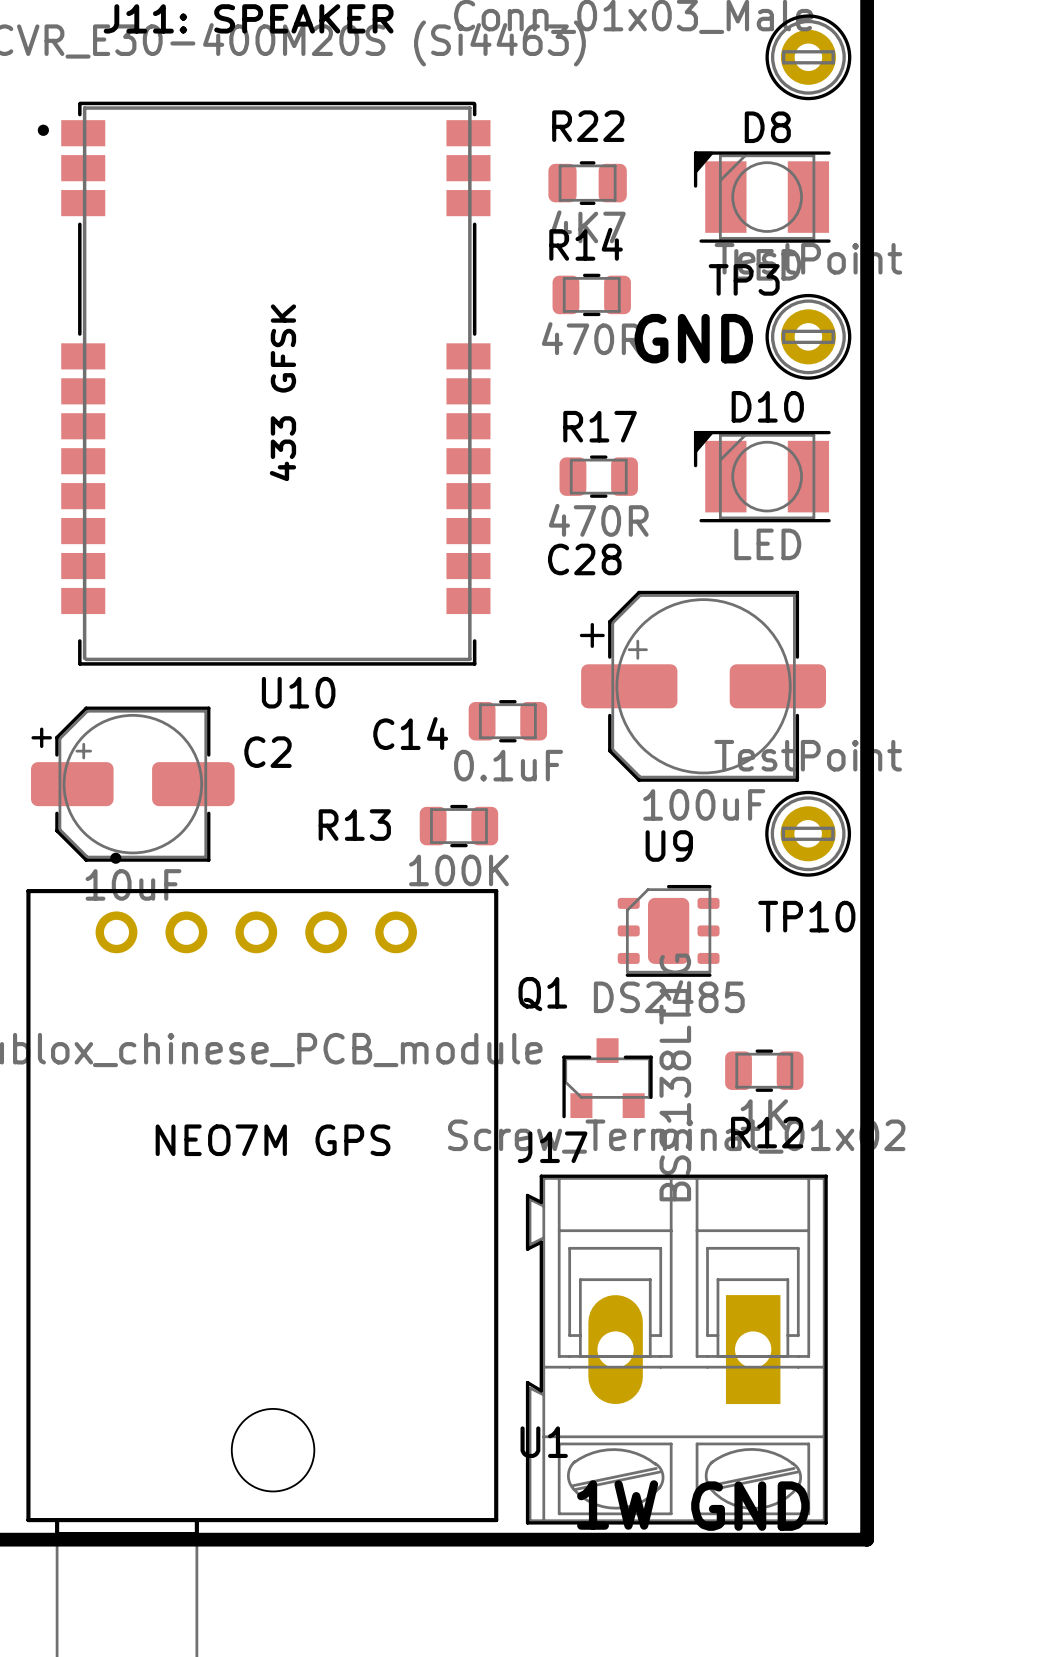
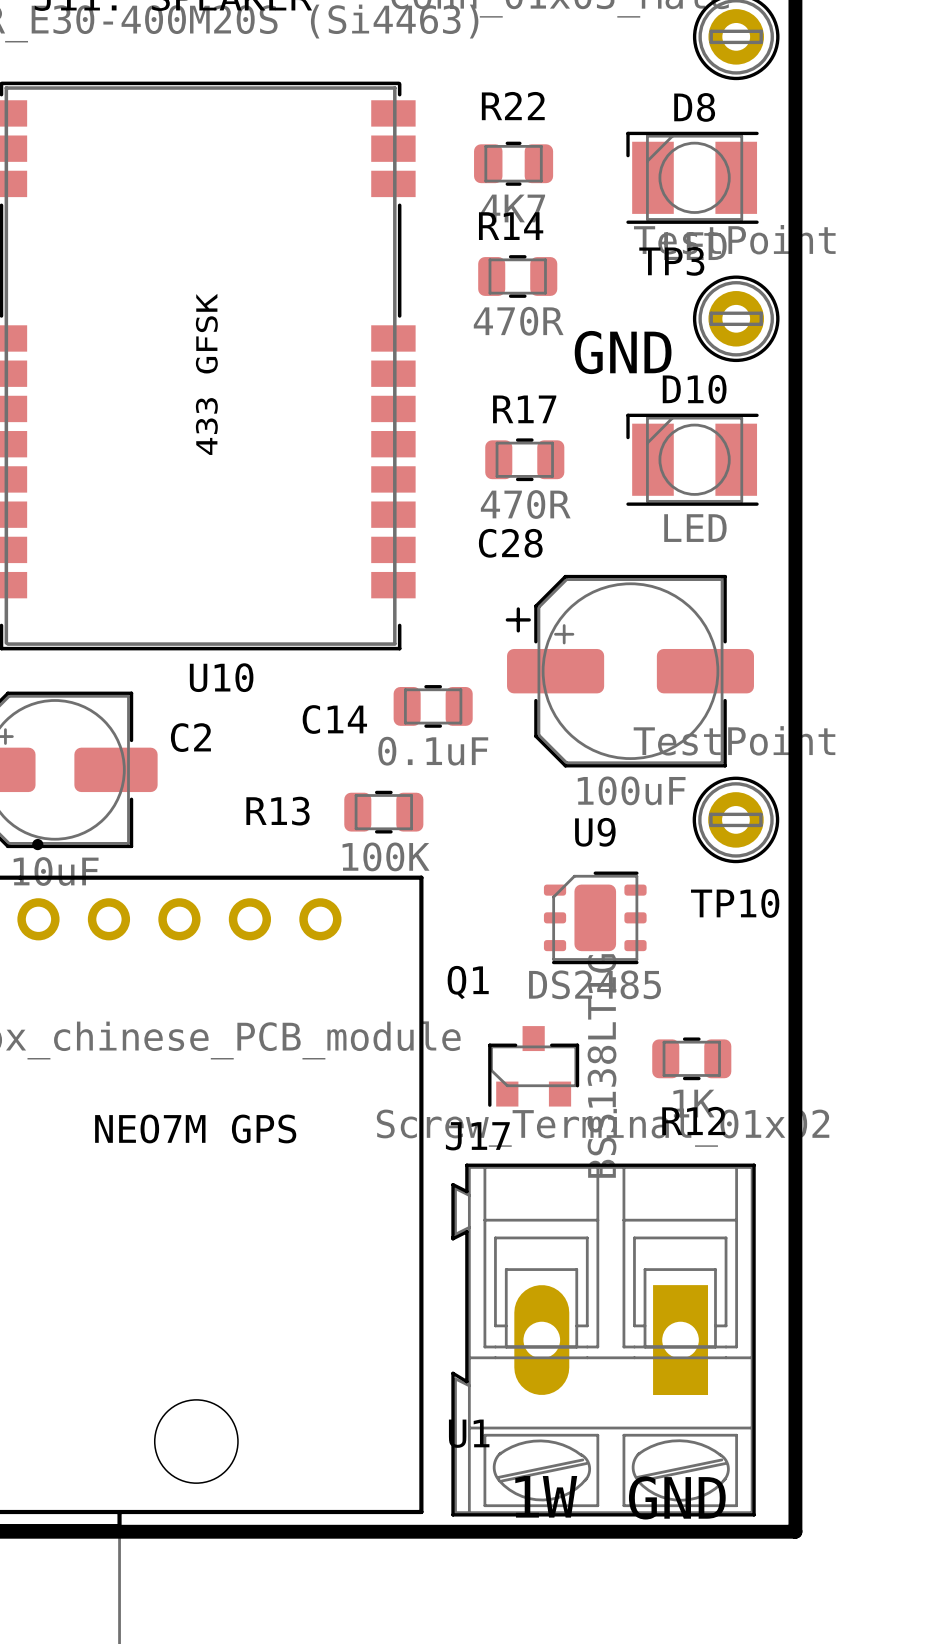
D8 footprint: [693, 151, 831, 243] -> [626, 131, 759, 224]
text position: GND (693, 338) -> GND (623, 352)
D10 footprint: [693, 430, 831, 523] -> [626, 413, 759, 506]

